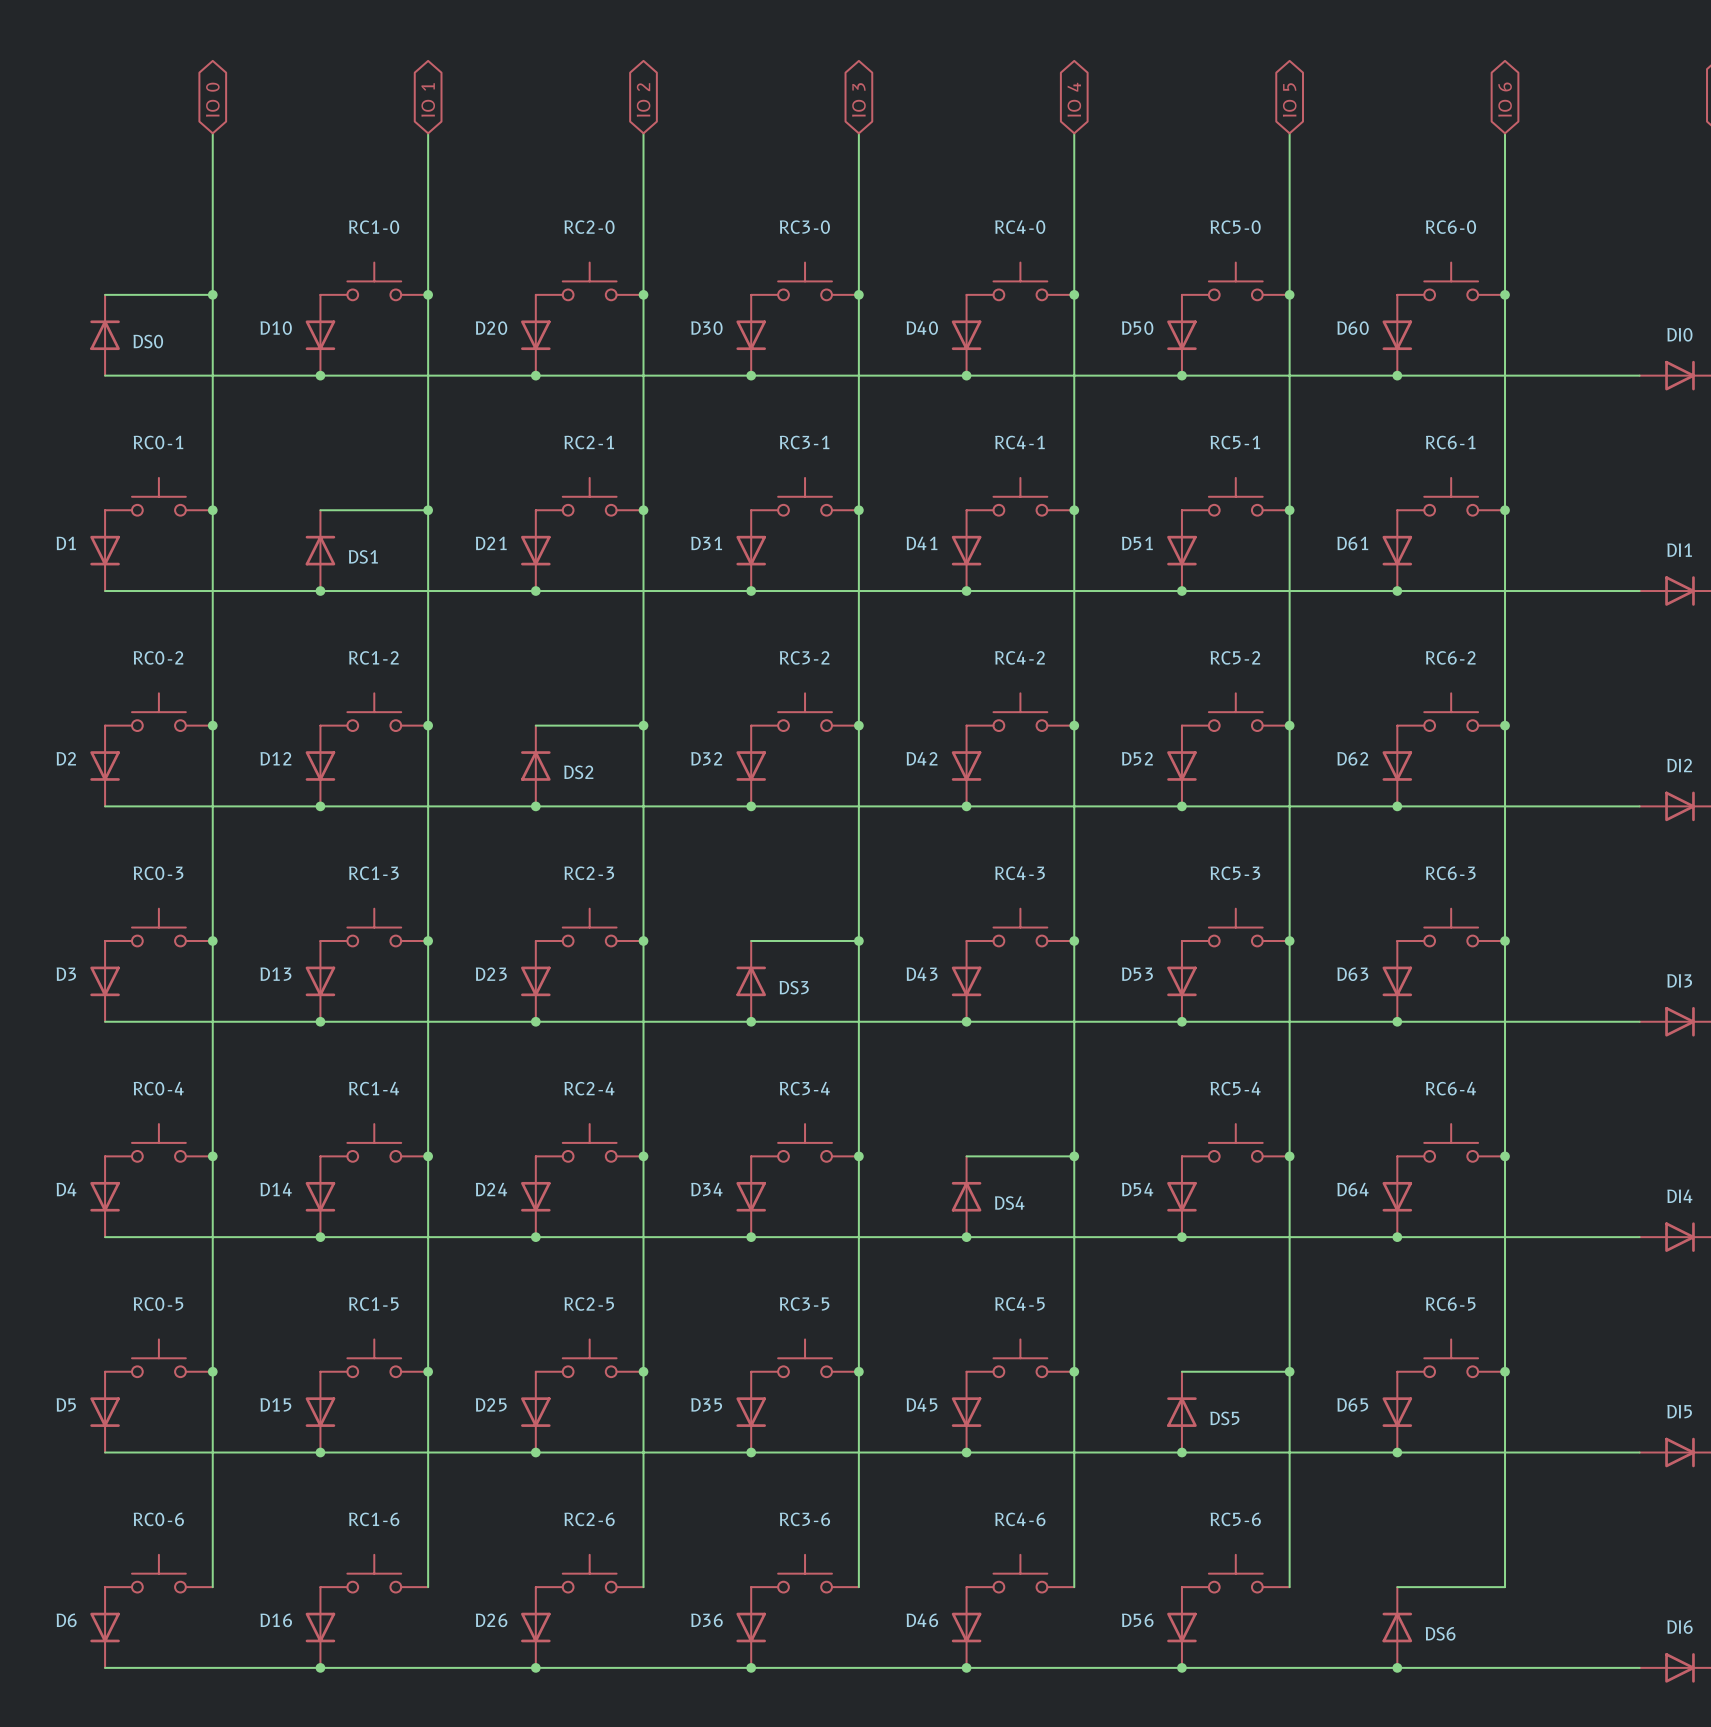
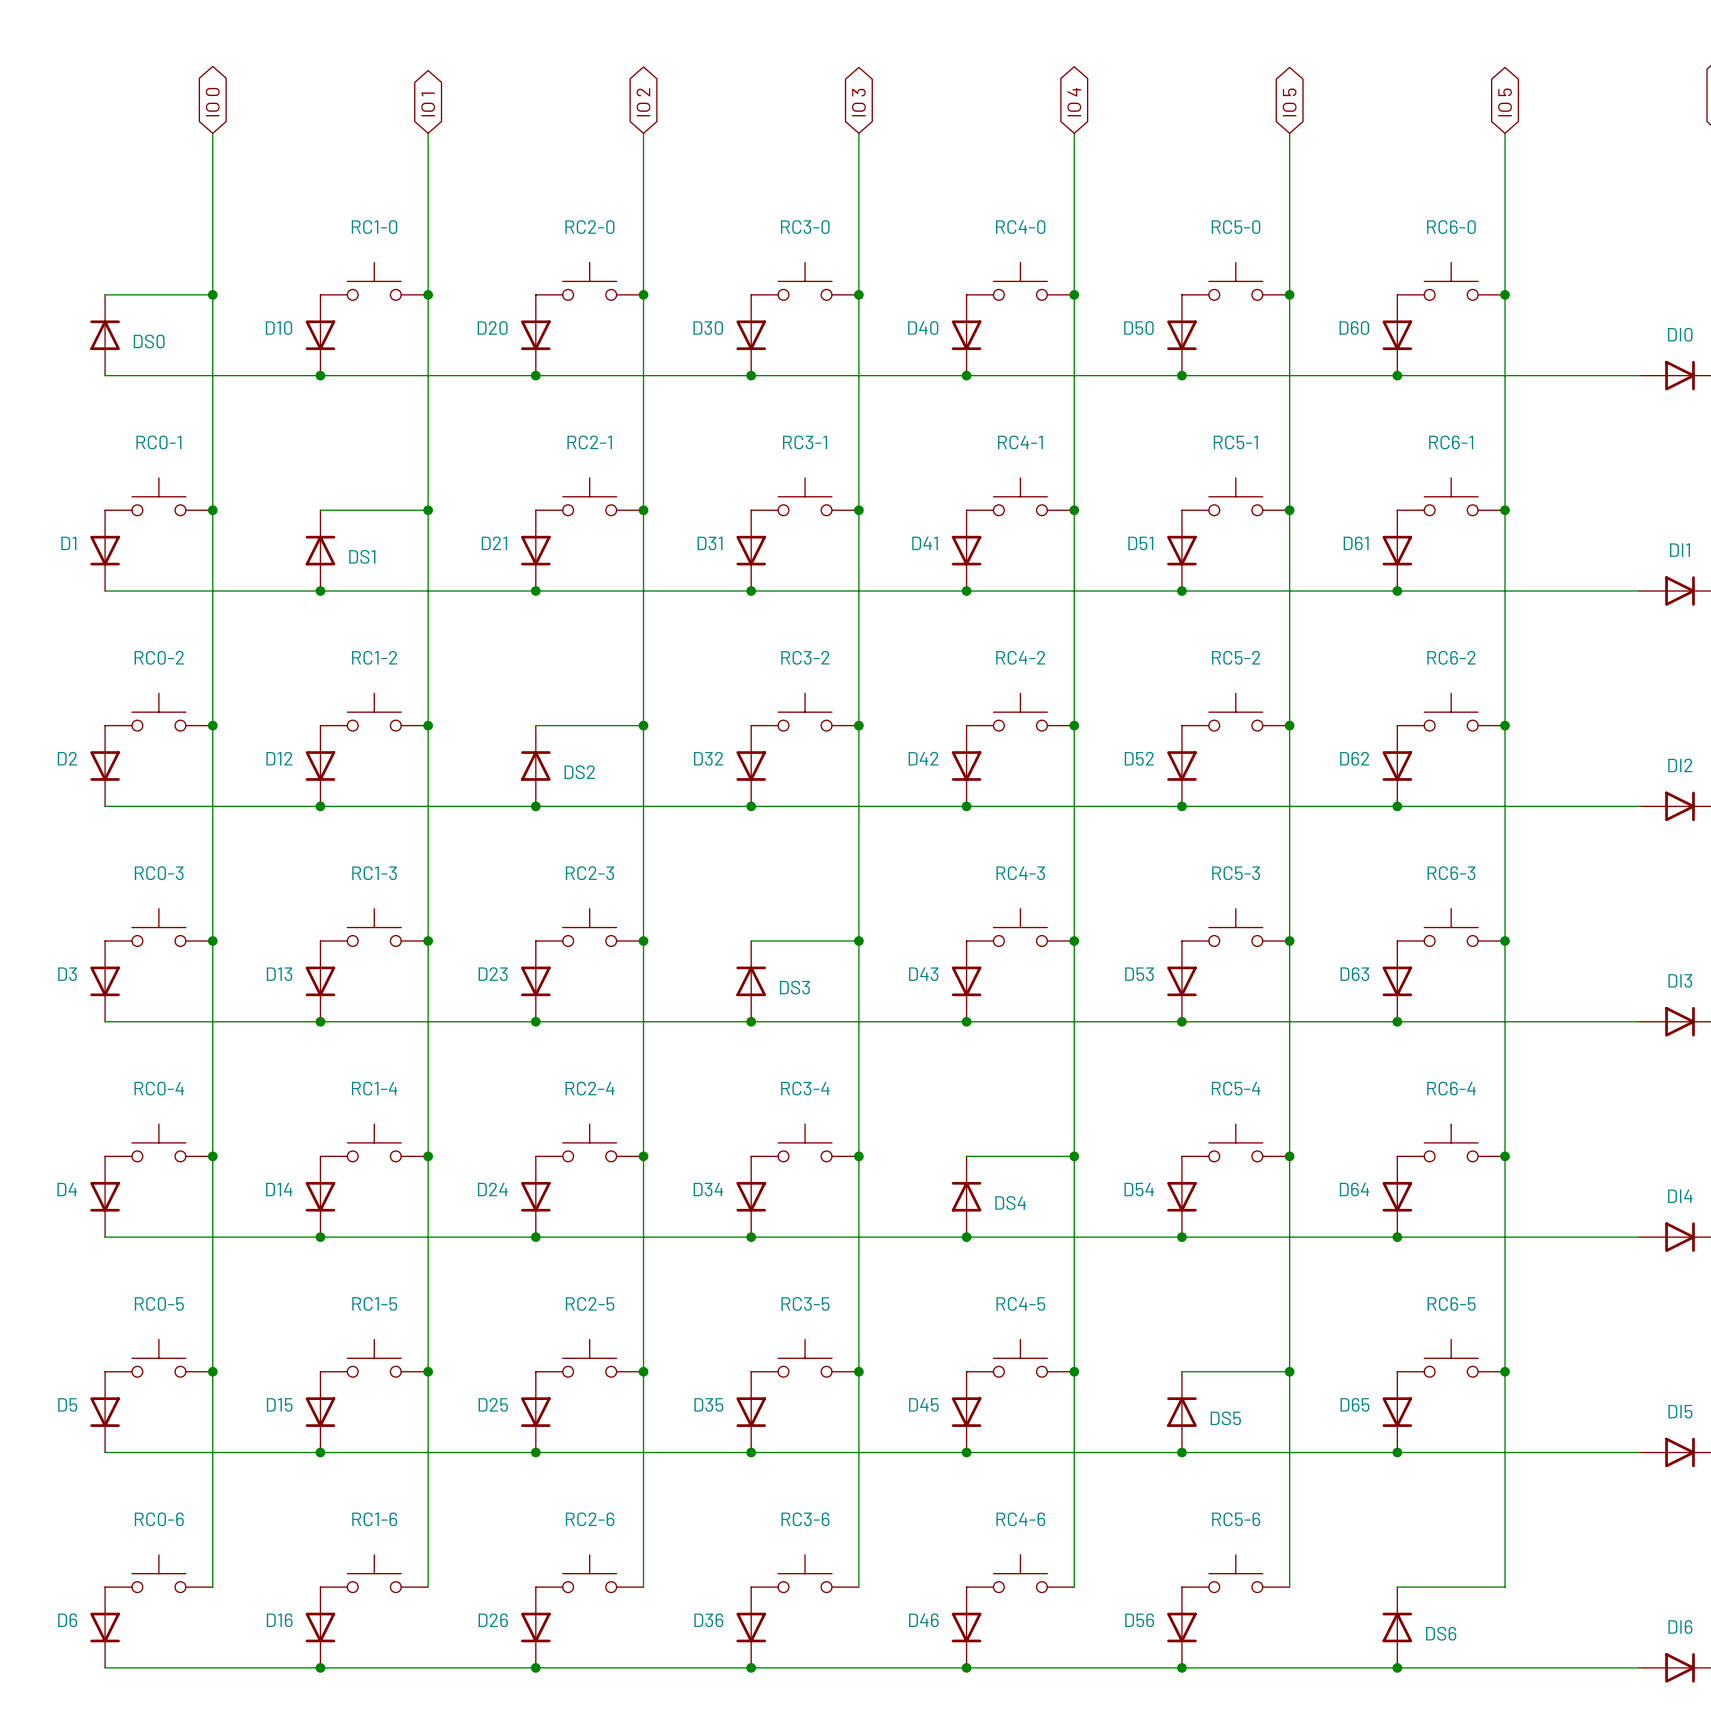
global label: IO 6 (1505, 99) -> IO 5 (1505, 102)

